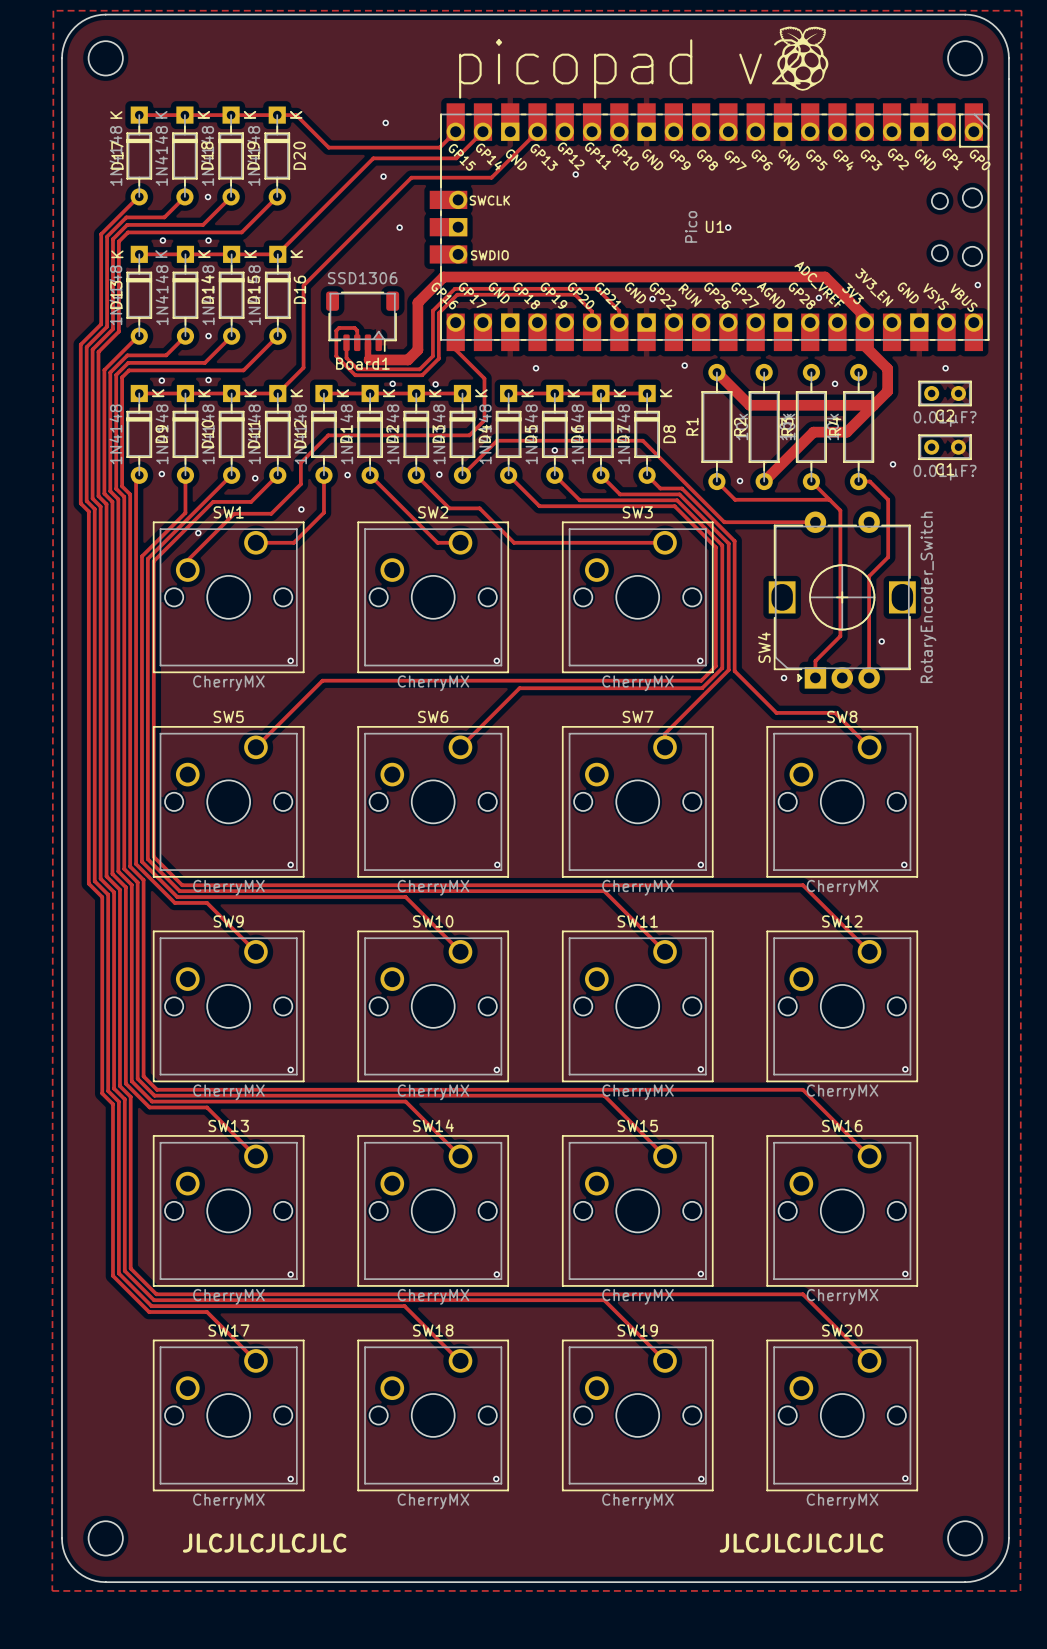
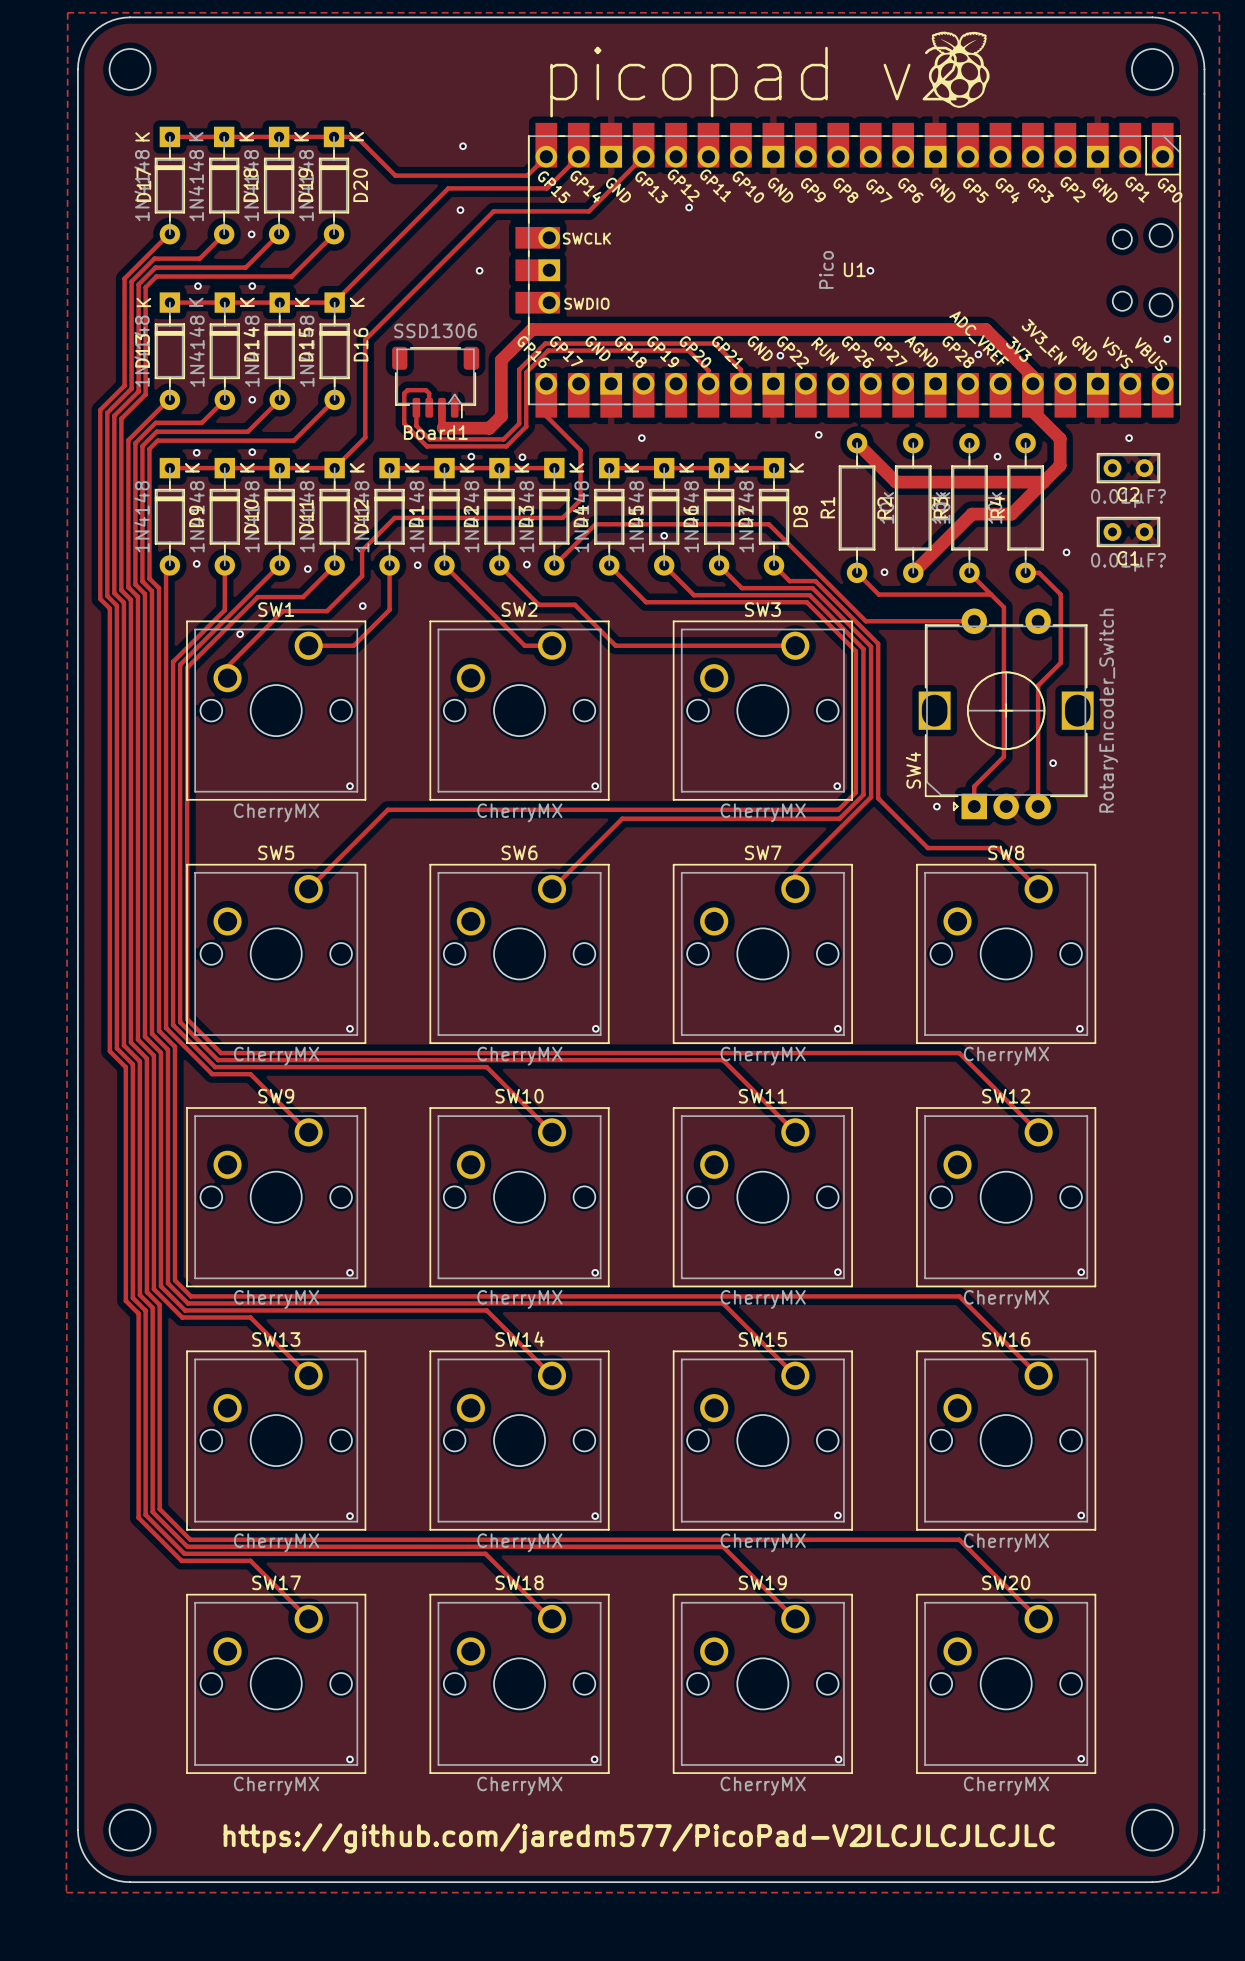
text: JLCJLCJLCJLC (264, 1543) -> https://github.com/jaredm577/PicoPad-V2 (544, 1838)

